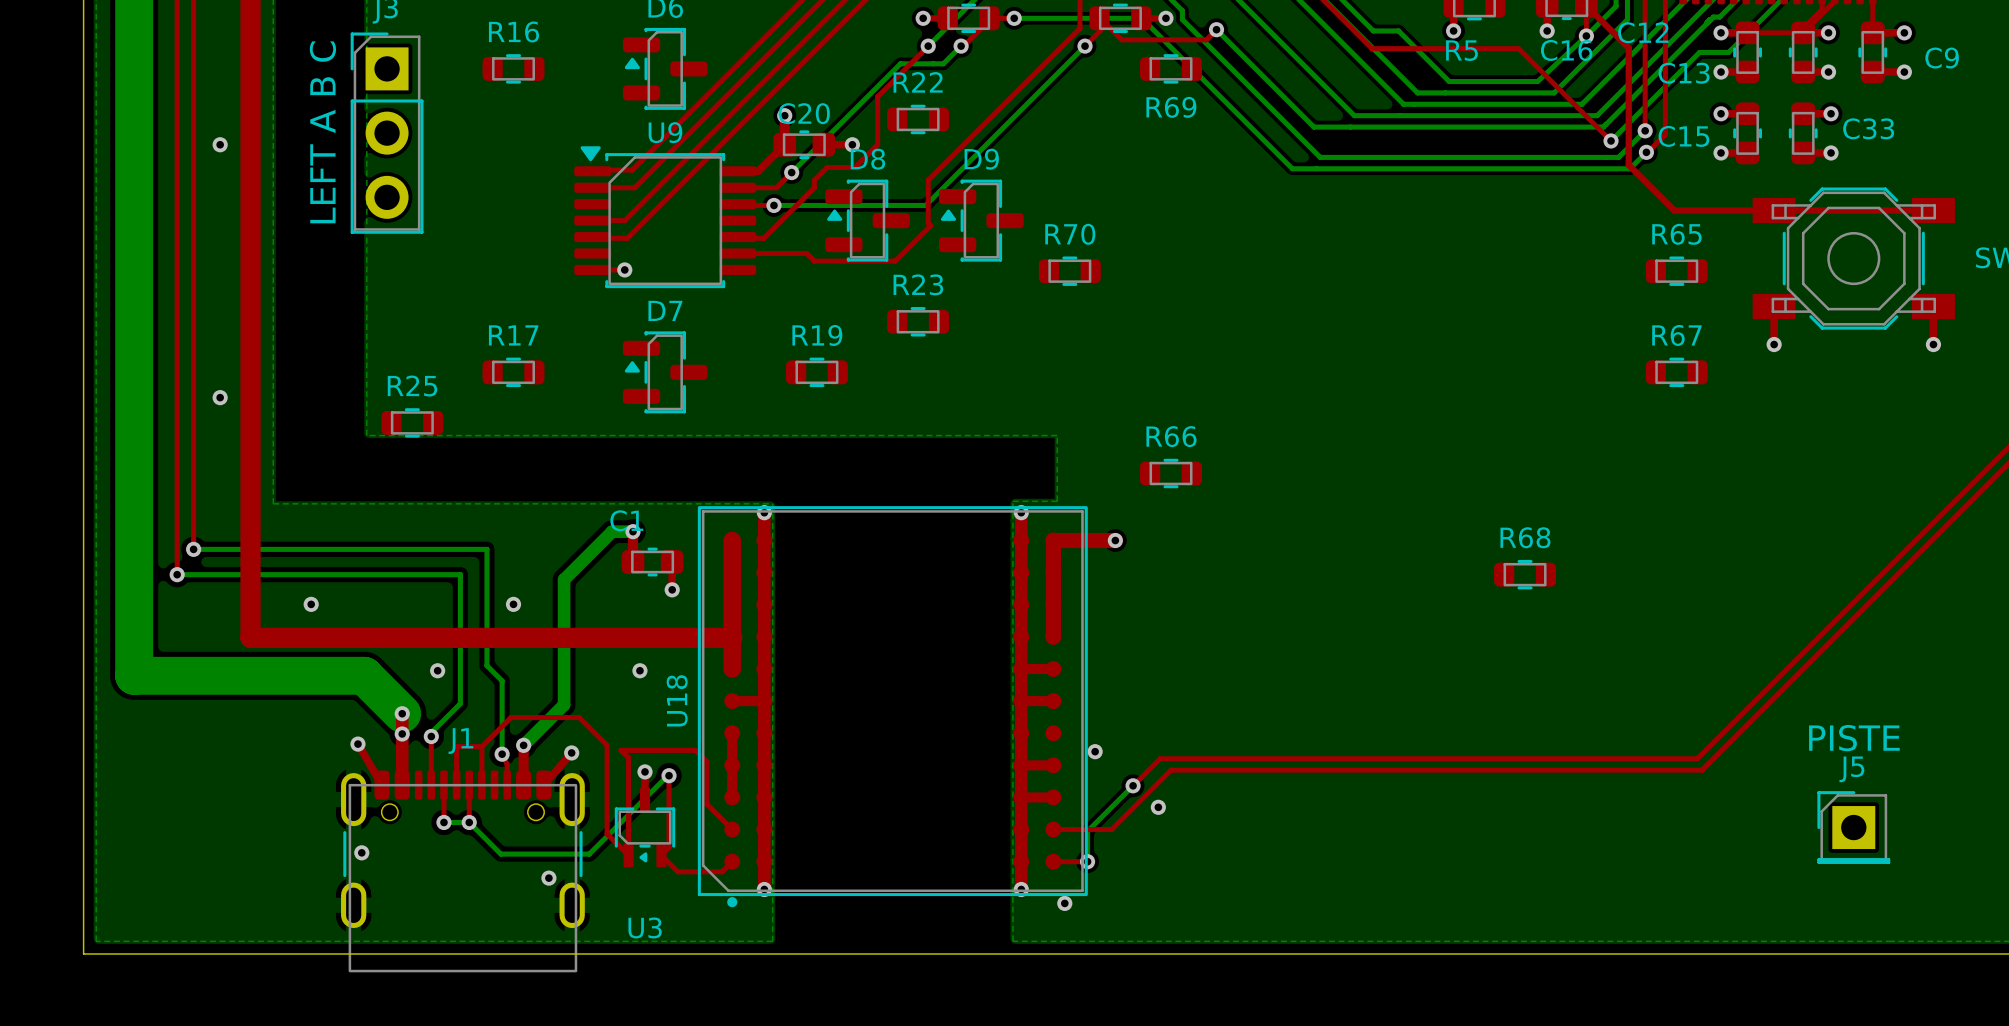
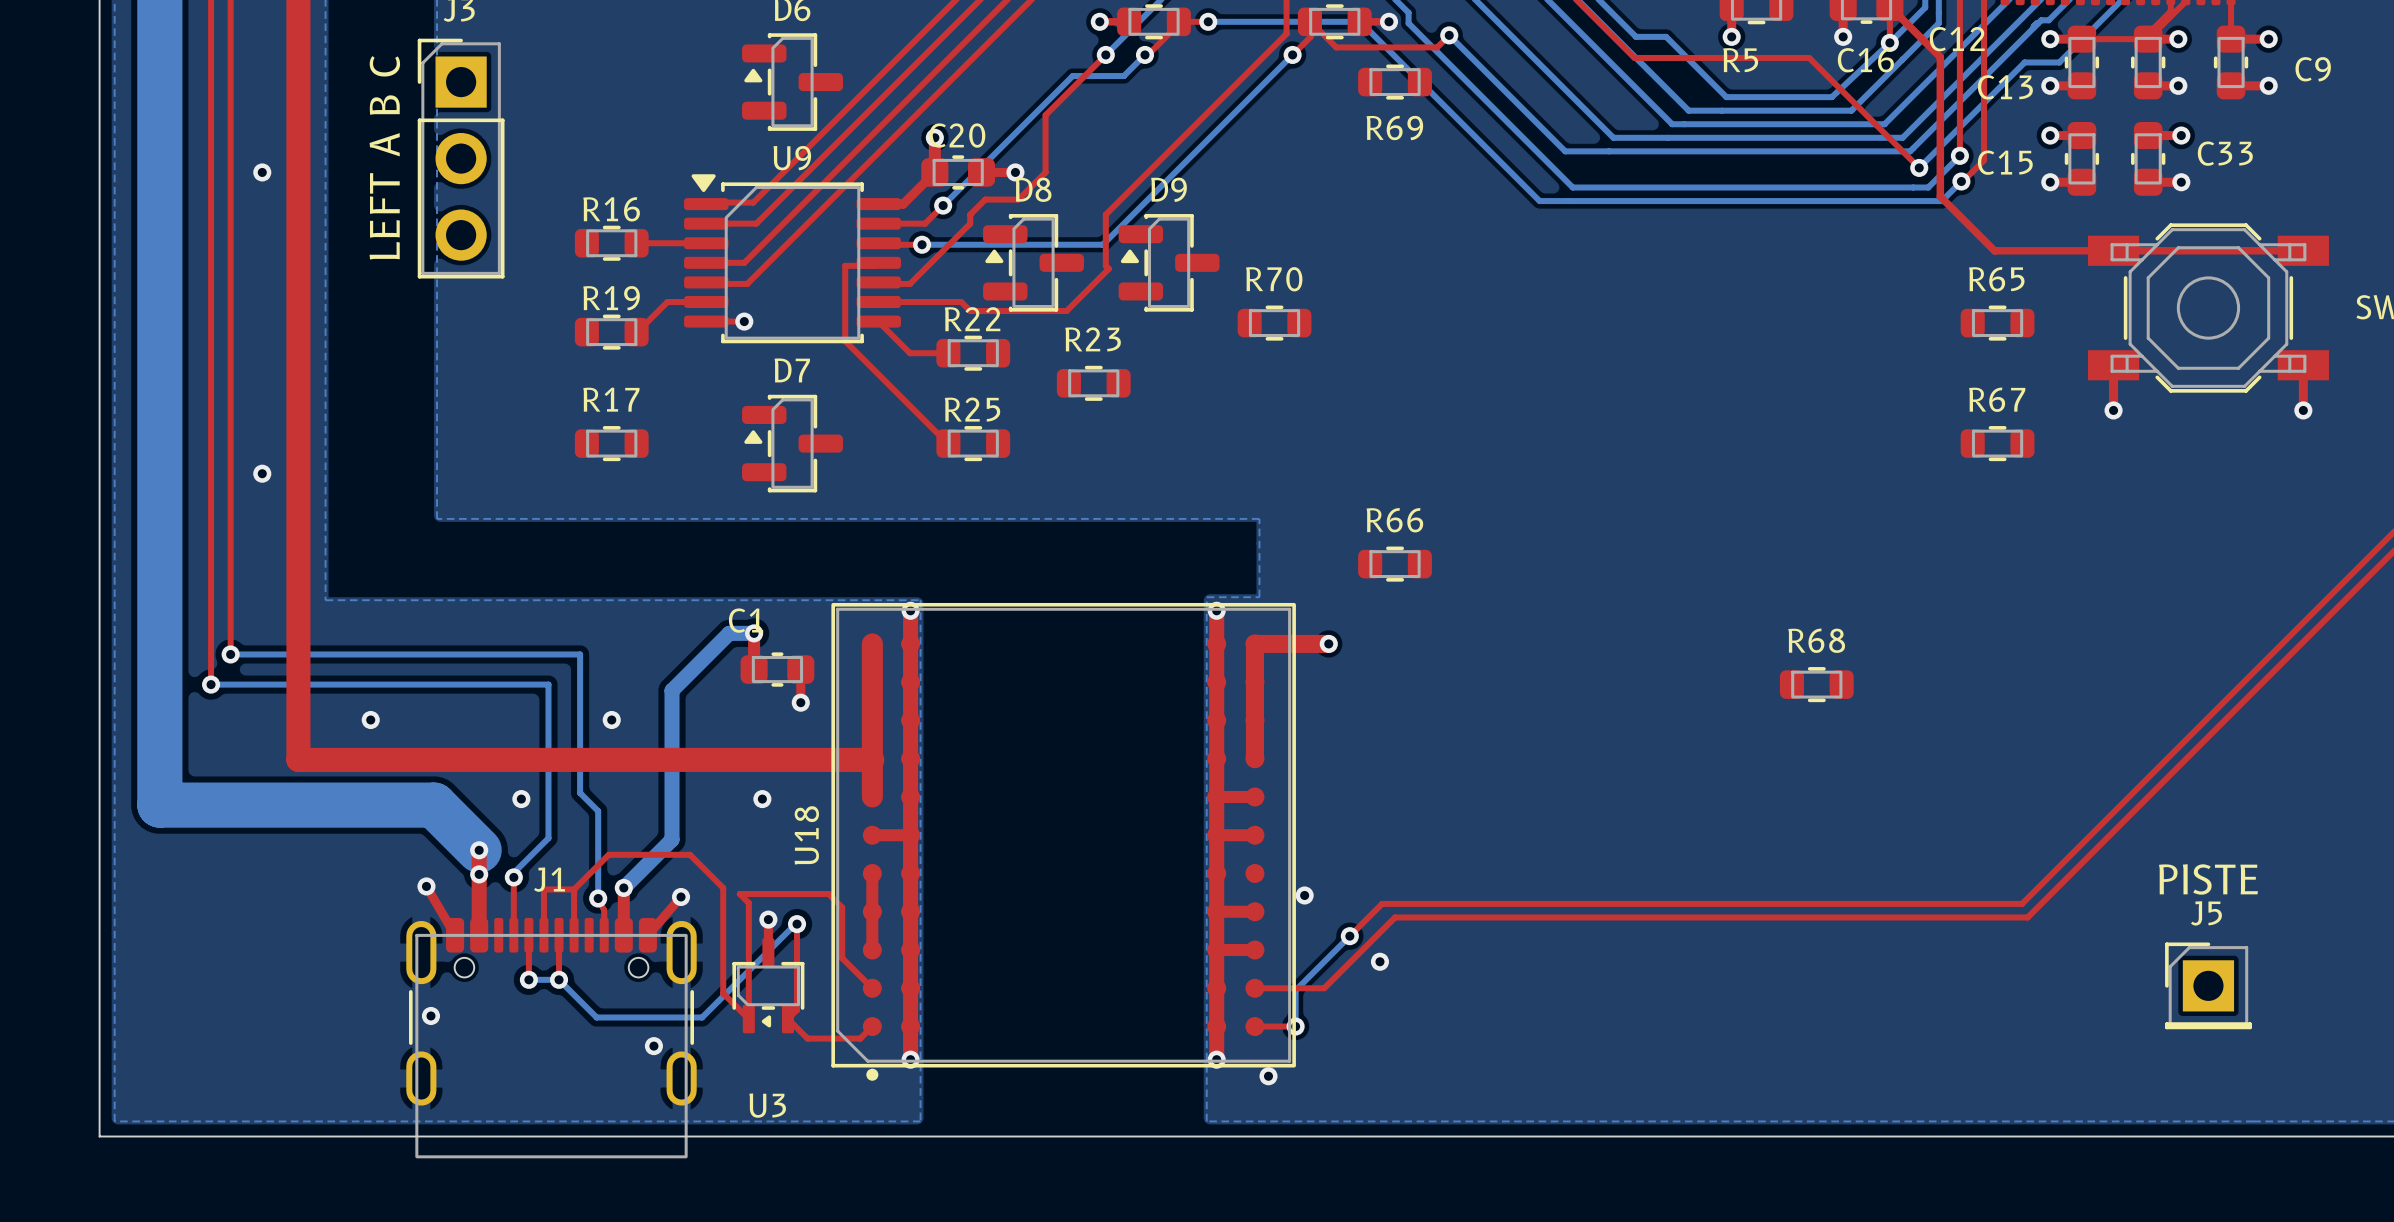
R16 name position: R16 (513, 31) -> R16 (611, 209)
R16 position: (513, 68) -> (611, 243)
R22 name position: R22 (918, 82) -> R22 (972, 319)
R22 position: (918, 119) -> (973, 353)
top track: none -> (636, 243) (706, 243)
top track: none -> (878, 262) (875, 265) (845, 265) (845, 341) (948, 443)
top track: none -> (706, 301) (667, 301) (636, 332)
top track: none -> (878, 321) (910, 353) (948, 353)
R19: none -> (611, 332)
R19 name: R19 (817, 335) -> R25 (972, 409)
R25: (412, 422) -> none

